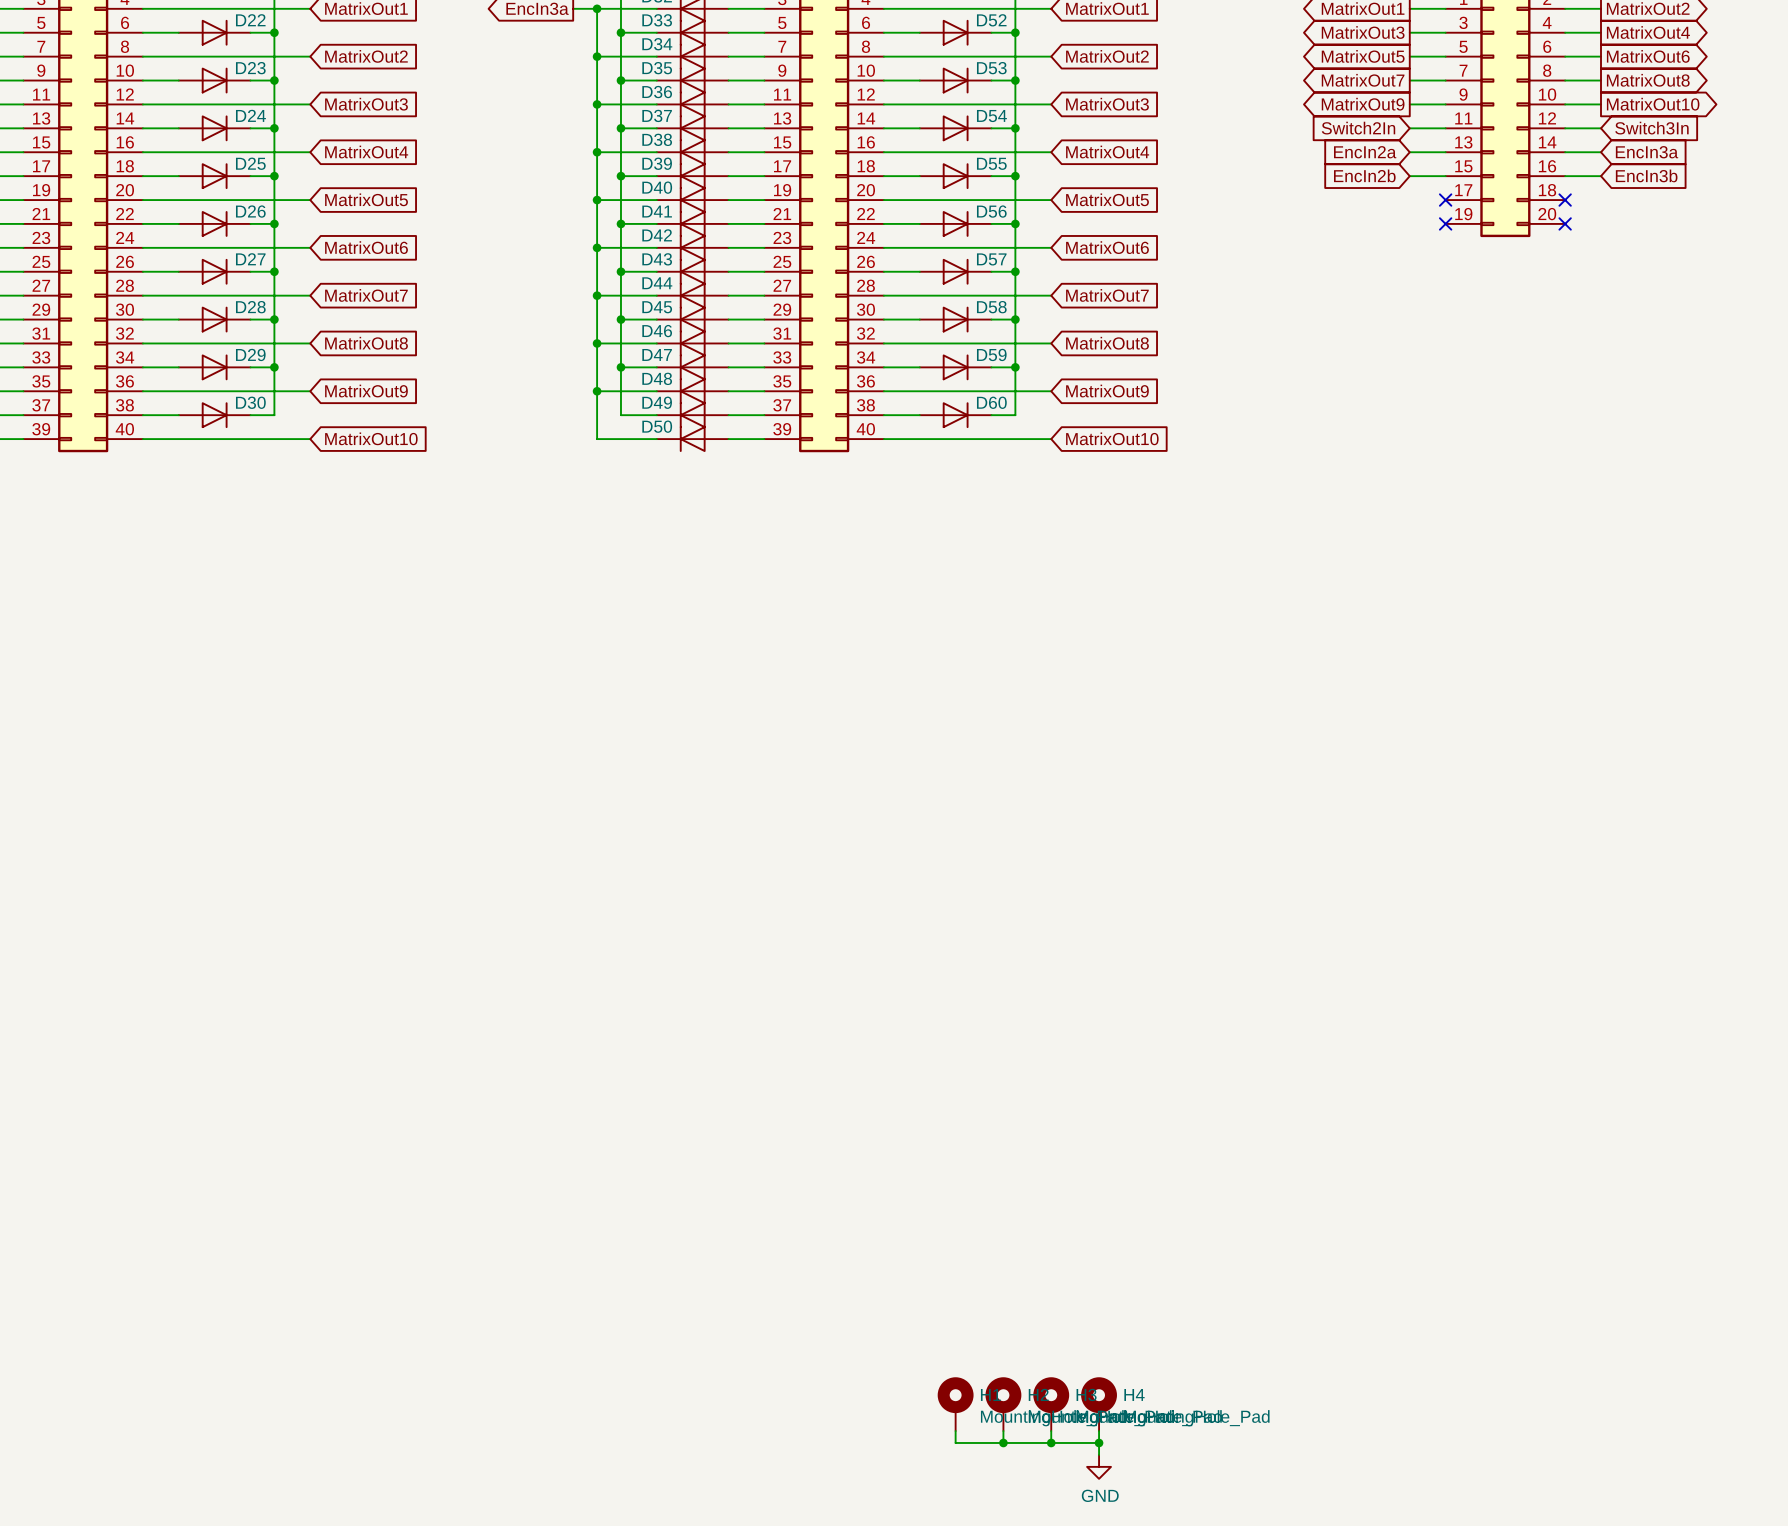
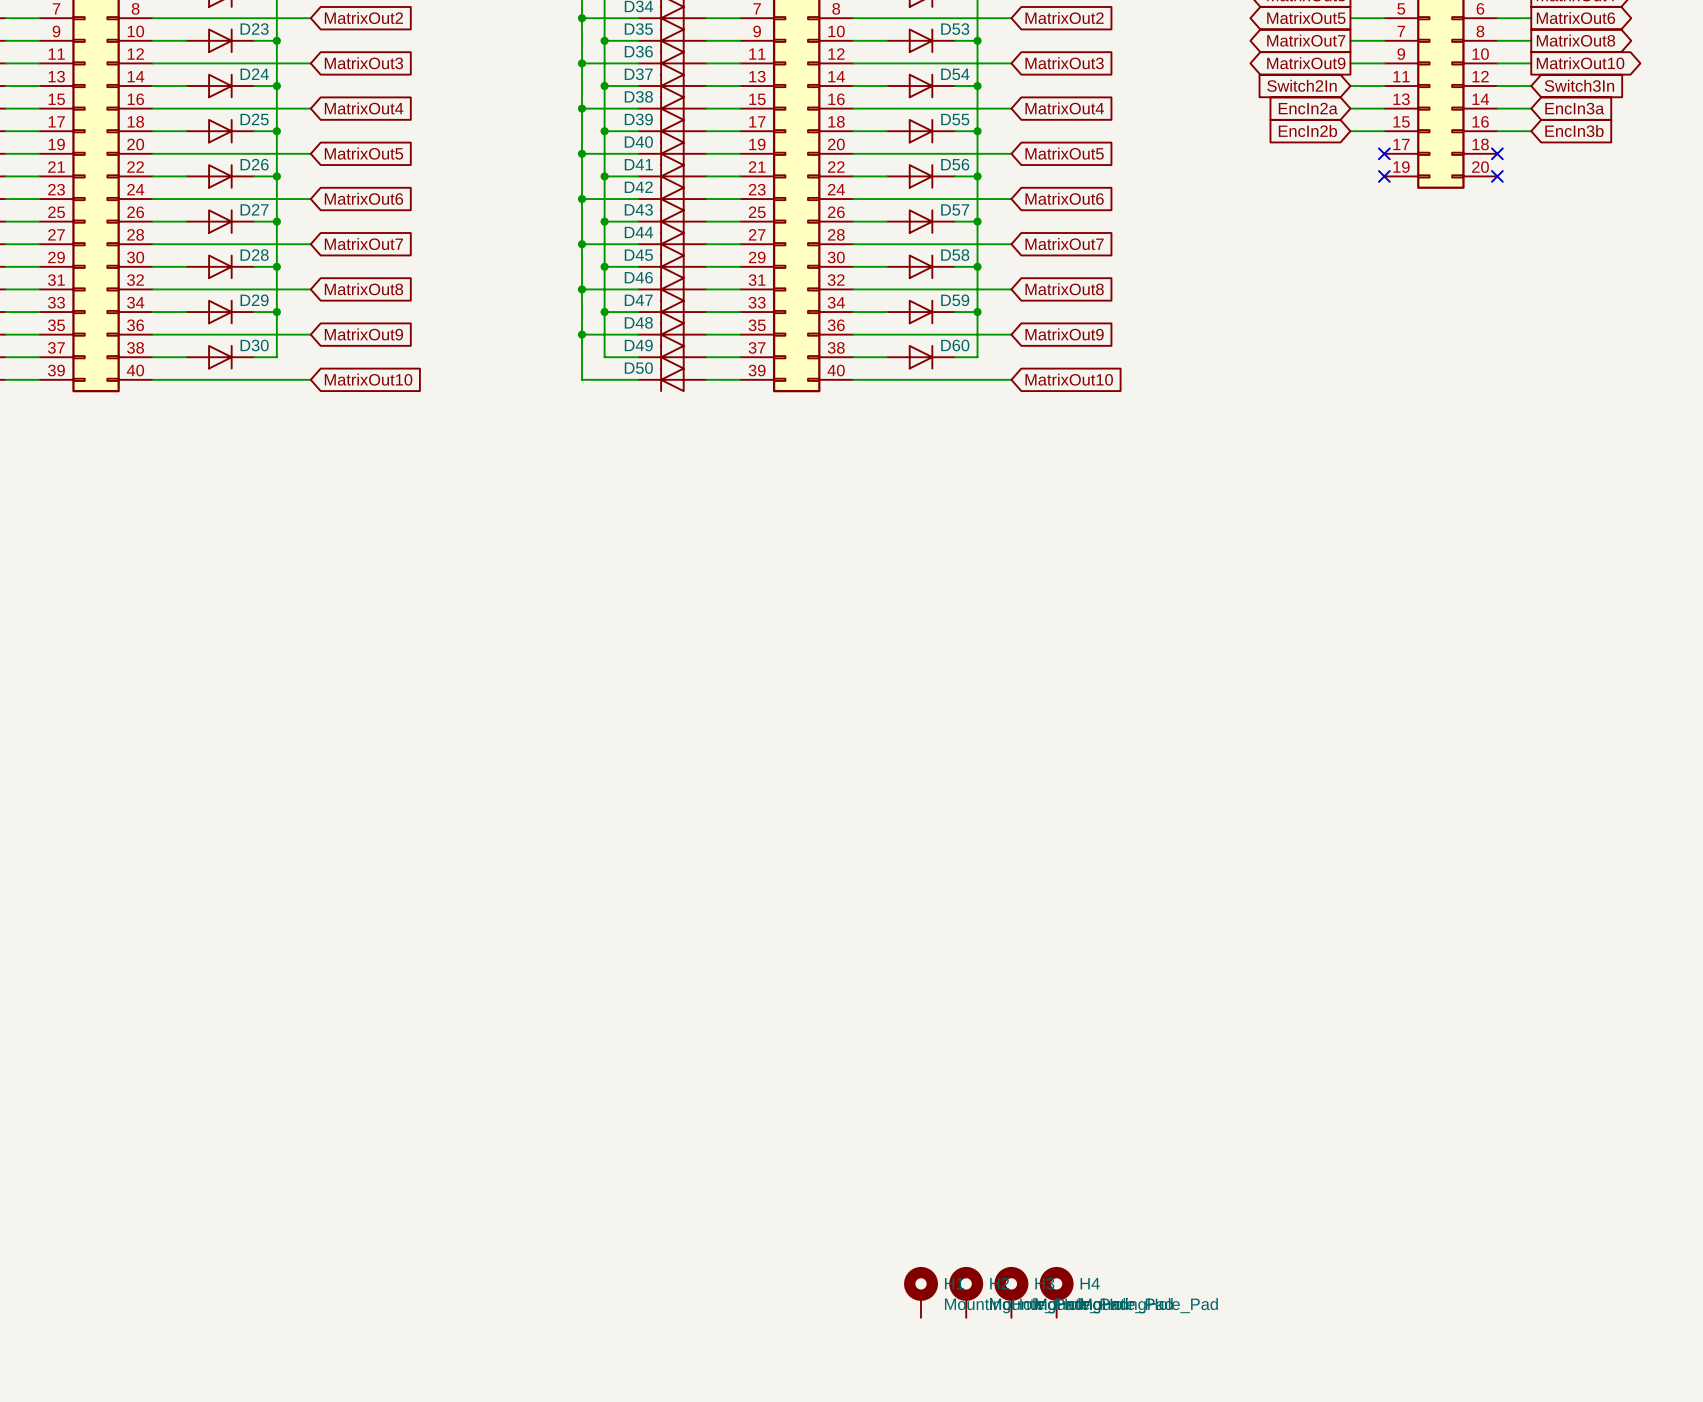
wire: (955, 1431) (955, 1442) (1099, 1442) -> none
wire: (1003, 1431) (1003, 1442) -> none
wire: (1051, 1431) (1051, 1442) -> none
wire: (1099, 1431) (1099, 1454) -> none
junction: (1003, 1442) -> none
junction: (1051, 1442) -> none
junction: (1099, 1442) -> none
power symbol: GND (1099, 1466) -> none

